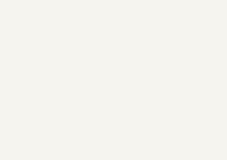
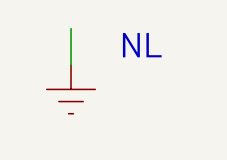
wire: none -> (71, 28) (71, 65)
text: none -> NL (142, 45)
power symbol: none -> (71, 89)

